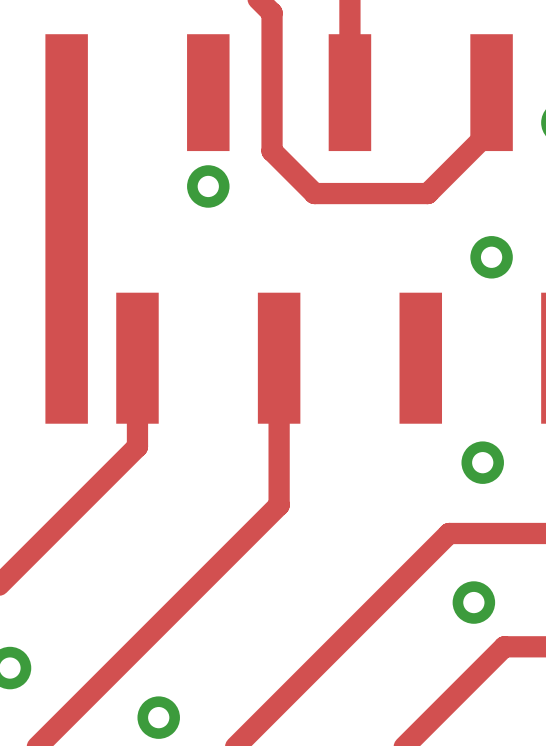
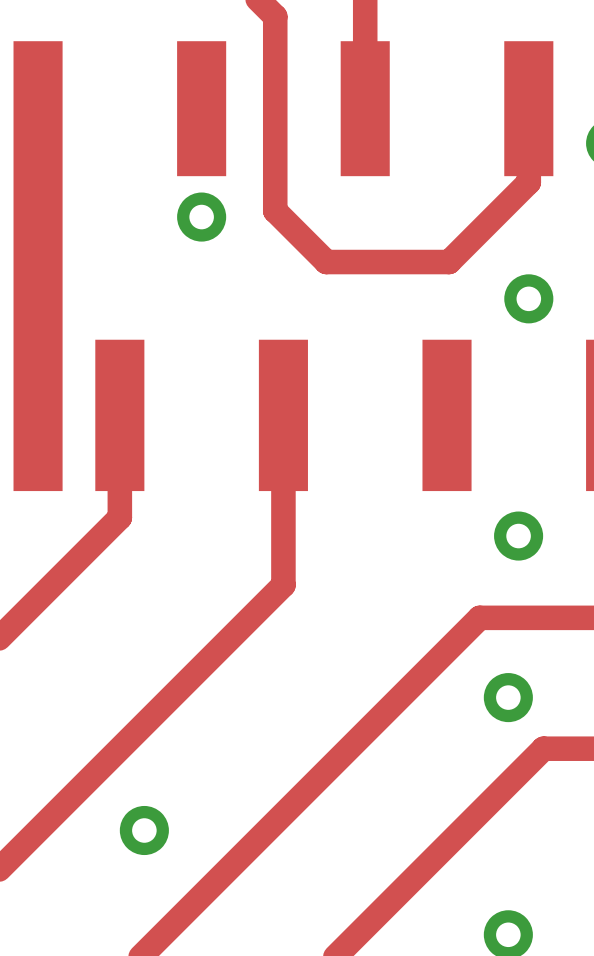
track: (491, 129) (427, 193) (314, 193) (272, 151) -> (528, 151) (528, 182) (449, 262) (326, 262) (275, 210) (275, 176)

